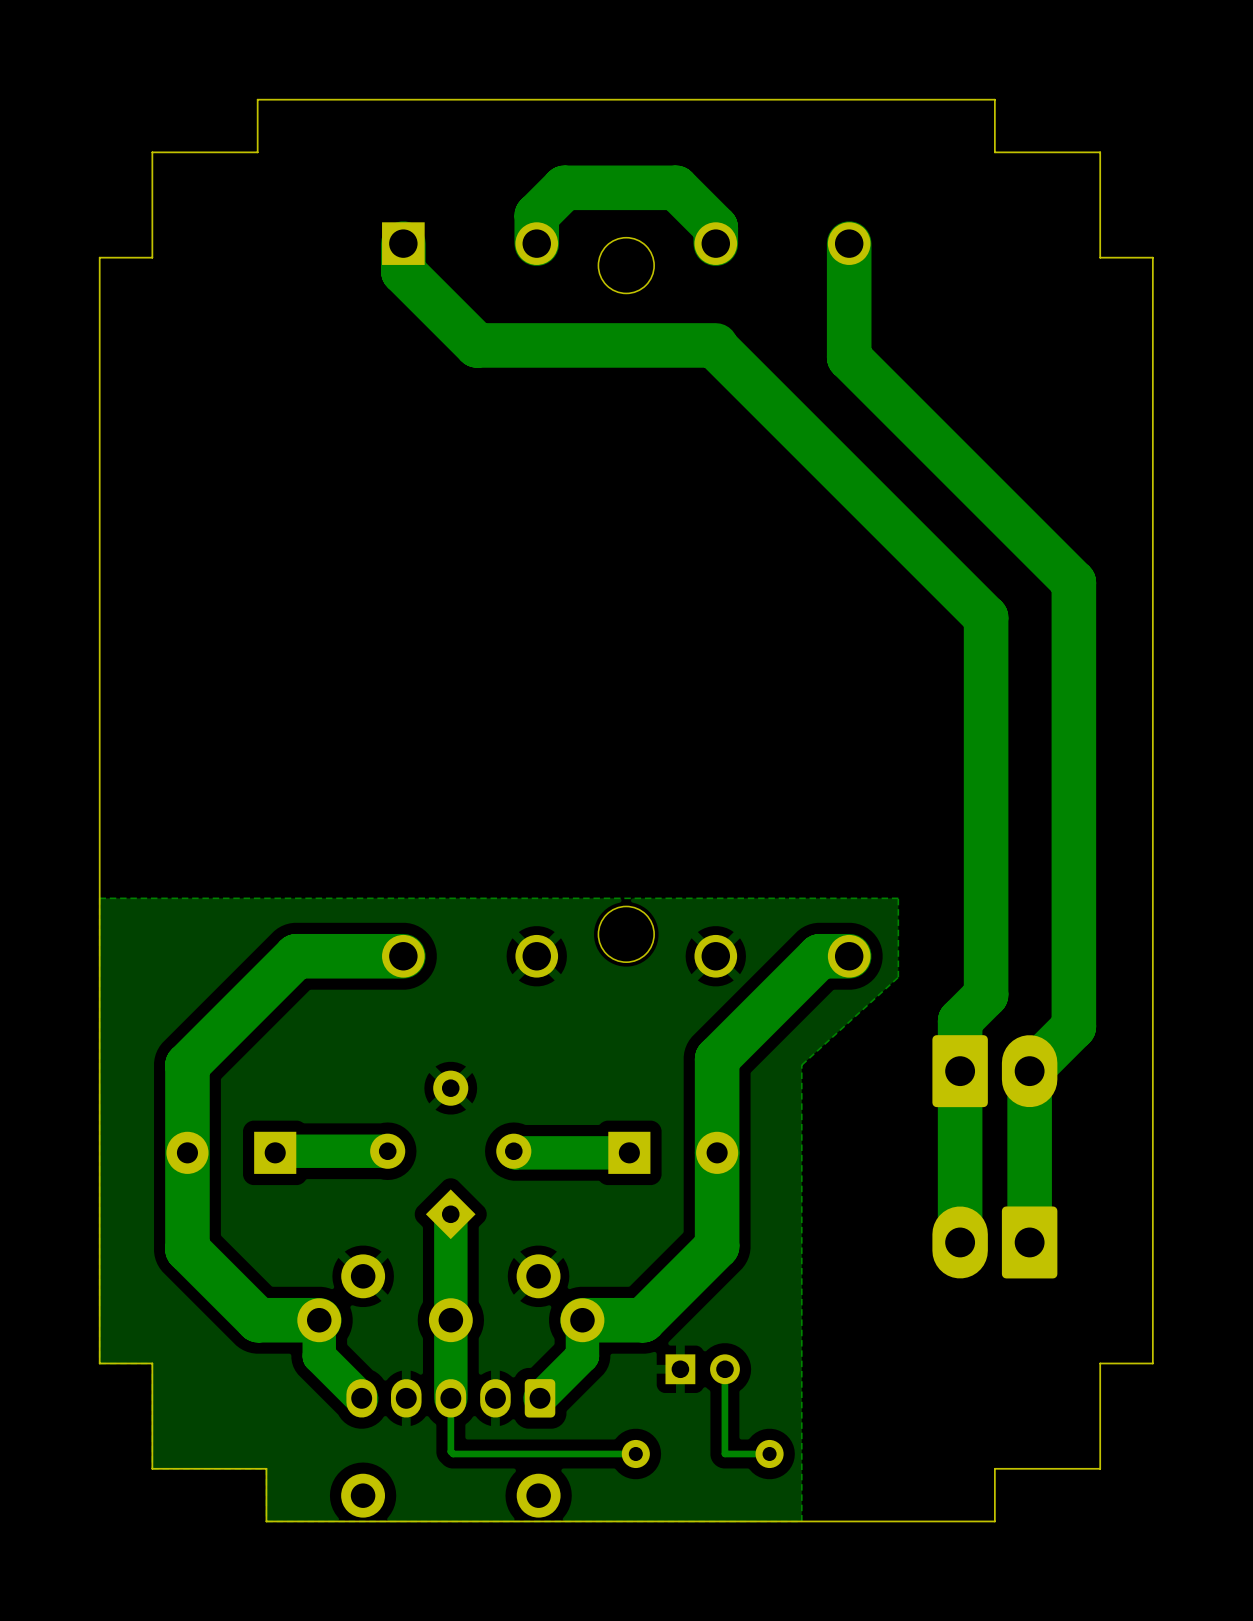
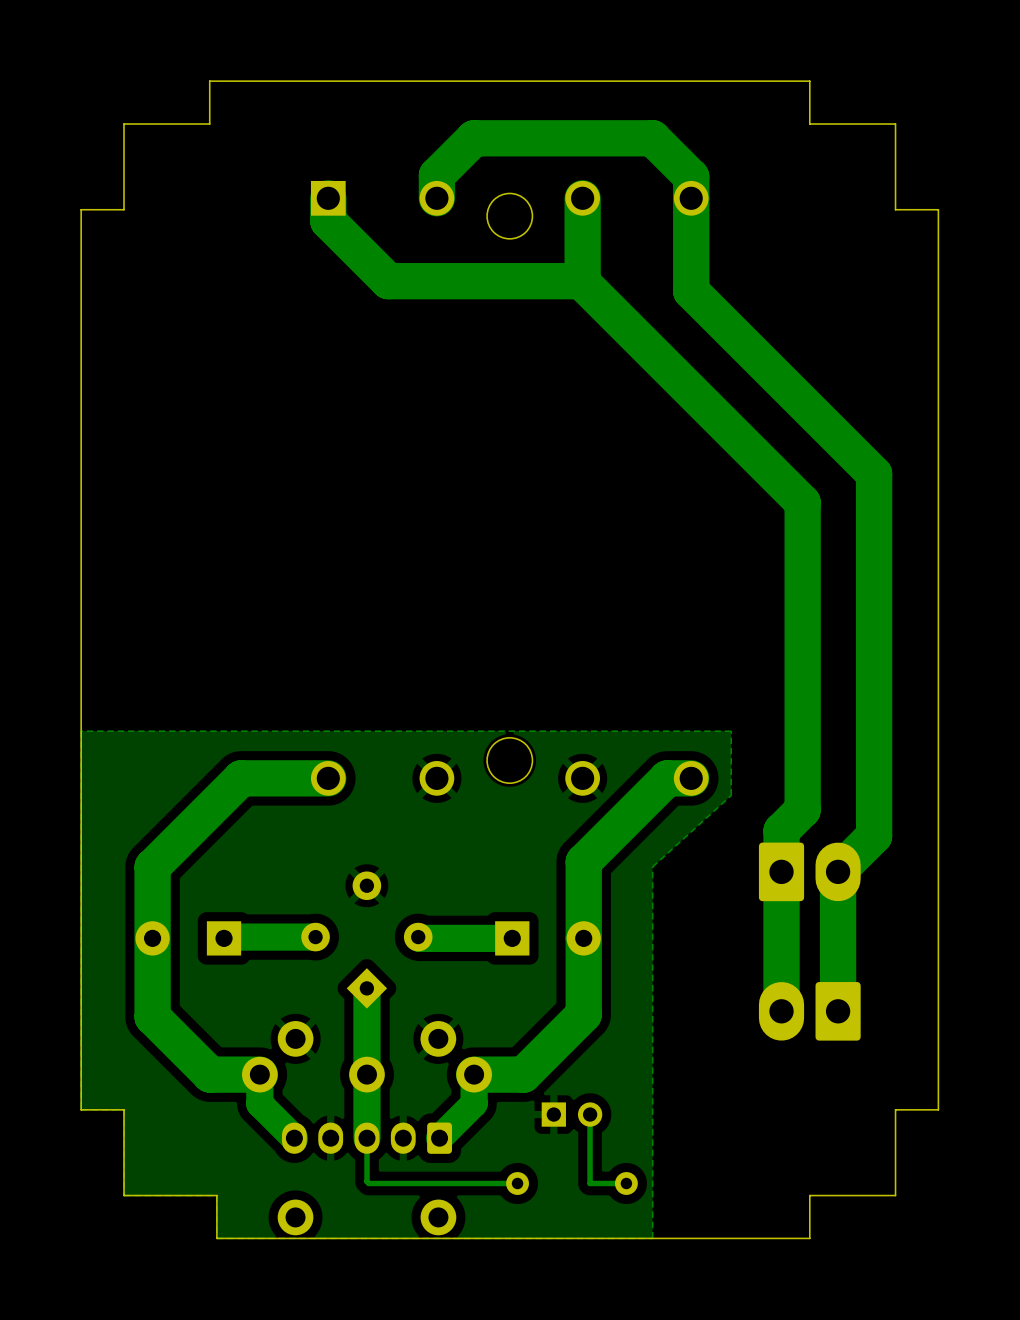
track: (564, 187) (675, 187) (715, 227) (715, 243) -> (459, 152) (474, 138) (652, 138) (691, 176) (691, 198)
track: none -> (582, 198) (582, 282)

